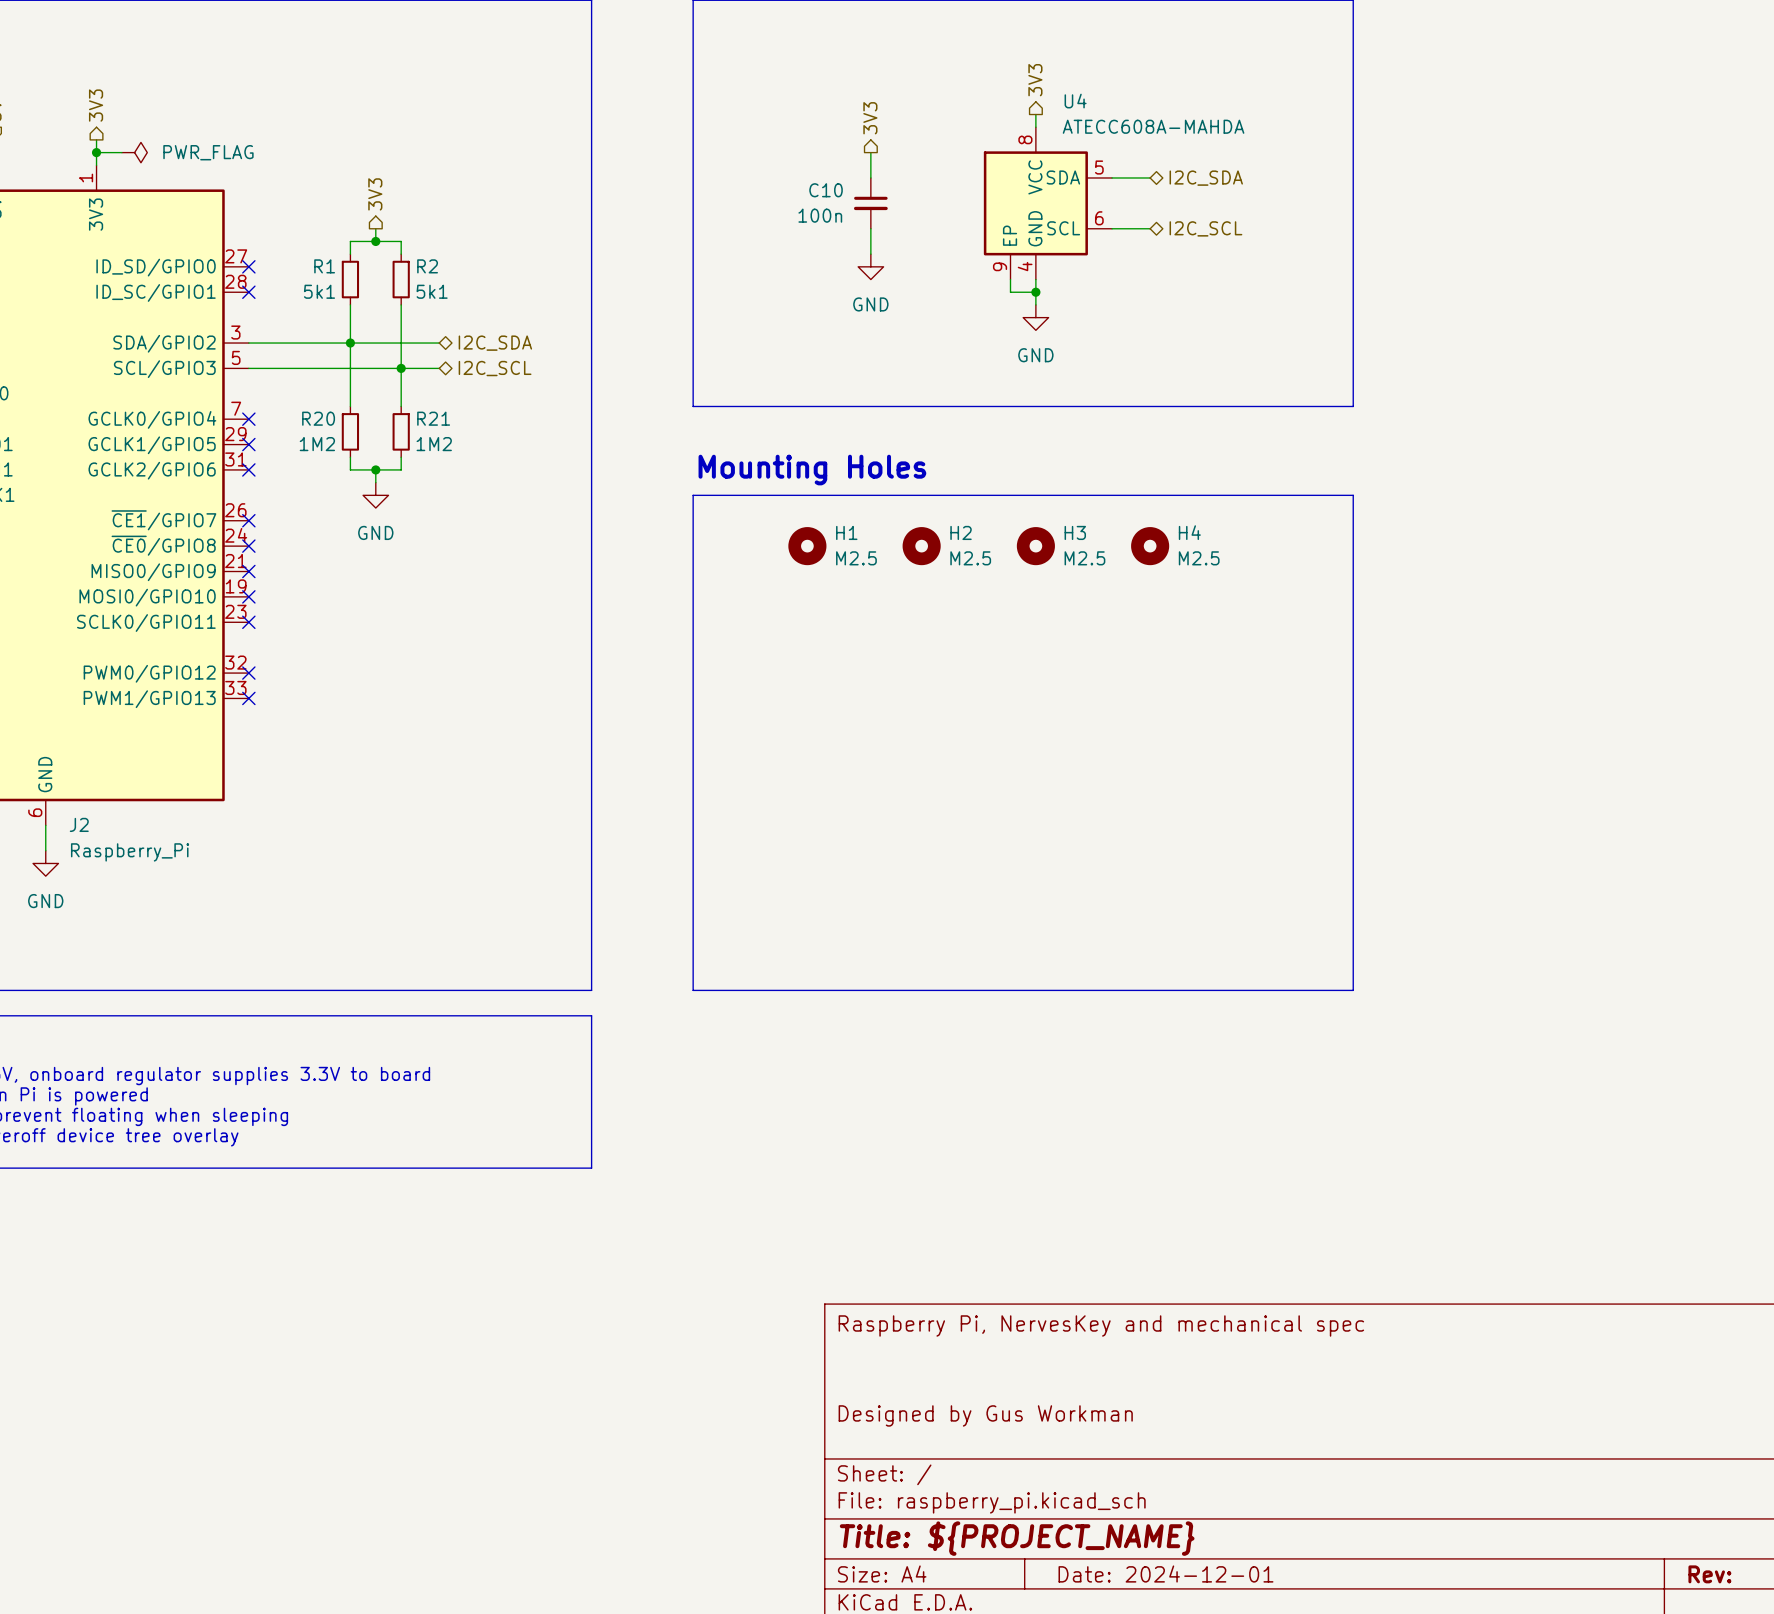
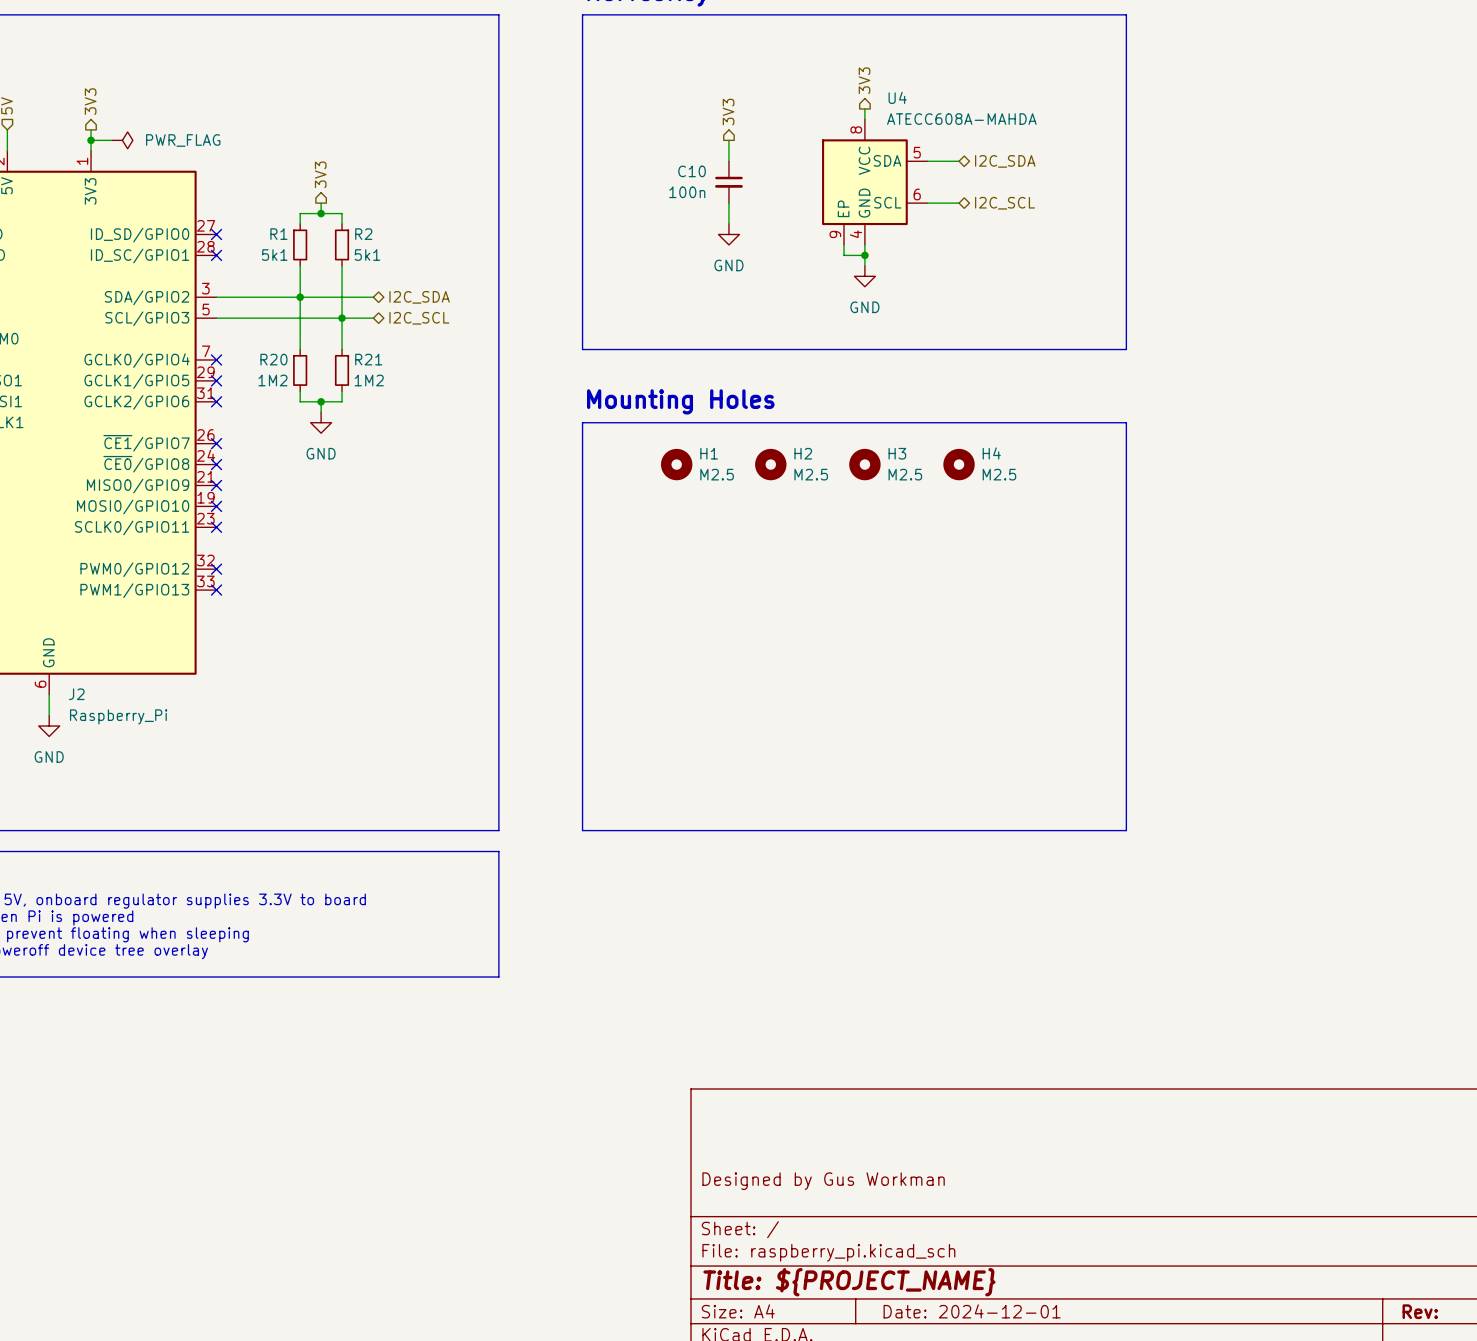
title block: Raspberry Pi, NervesKey and mechanical spec (1101, 1325) -> none

